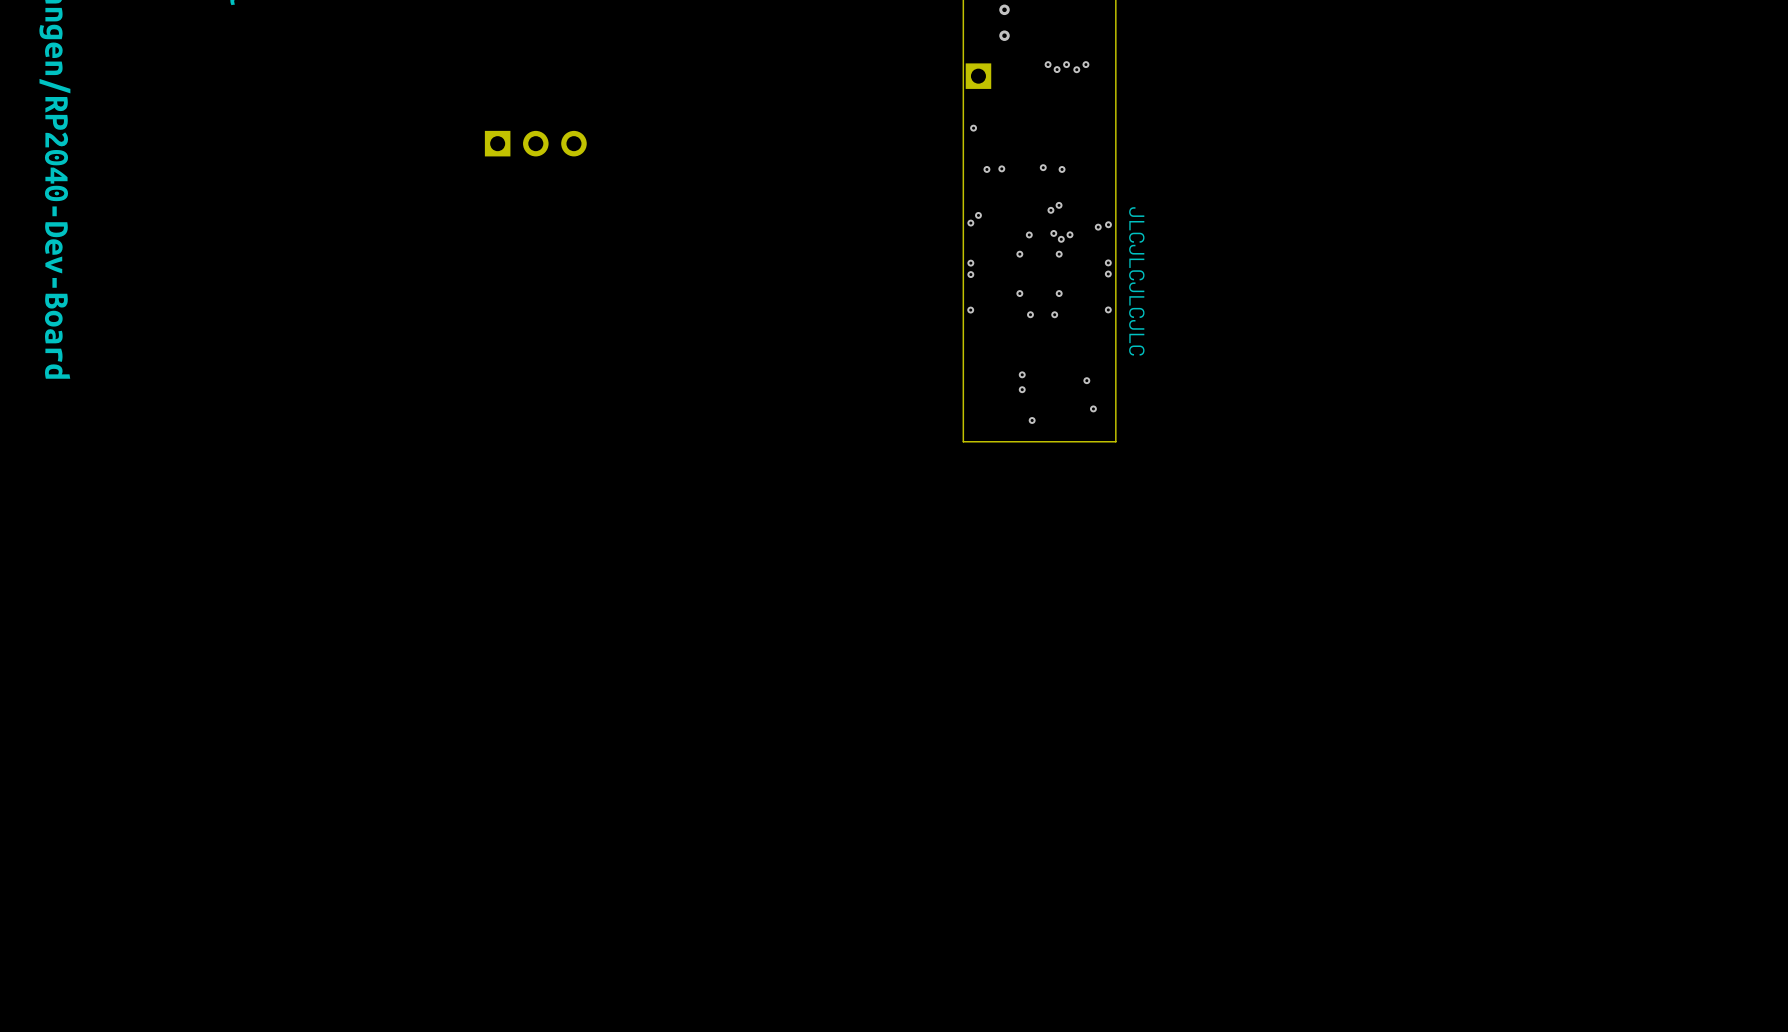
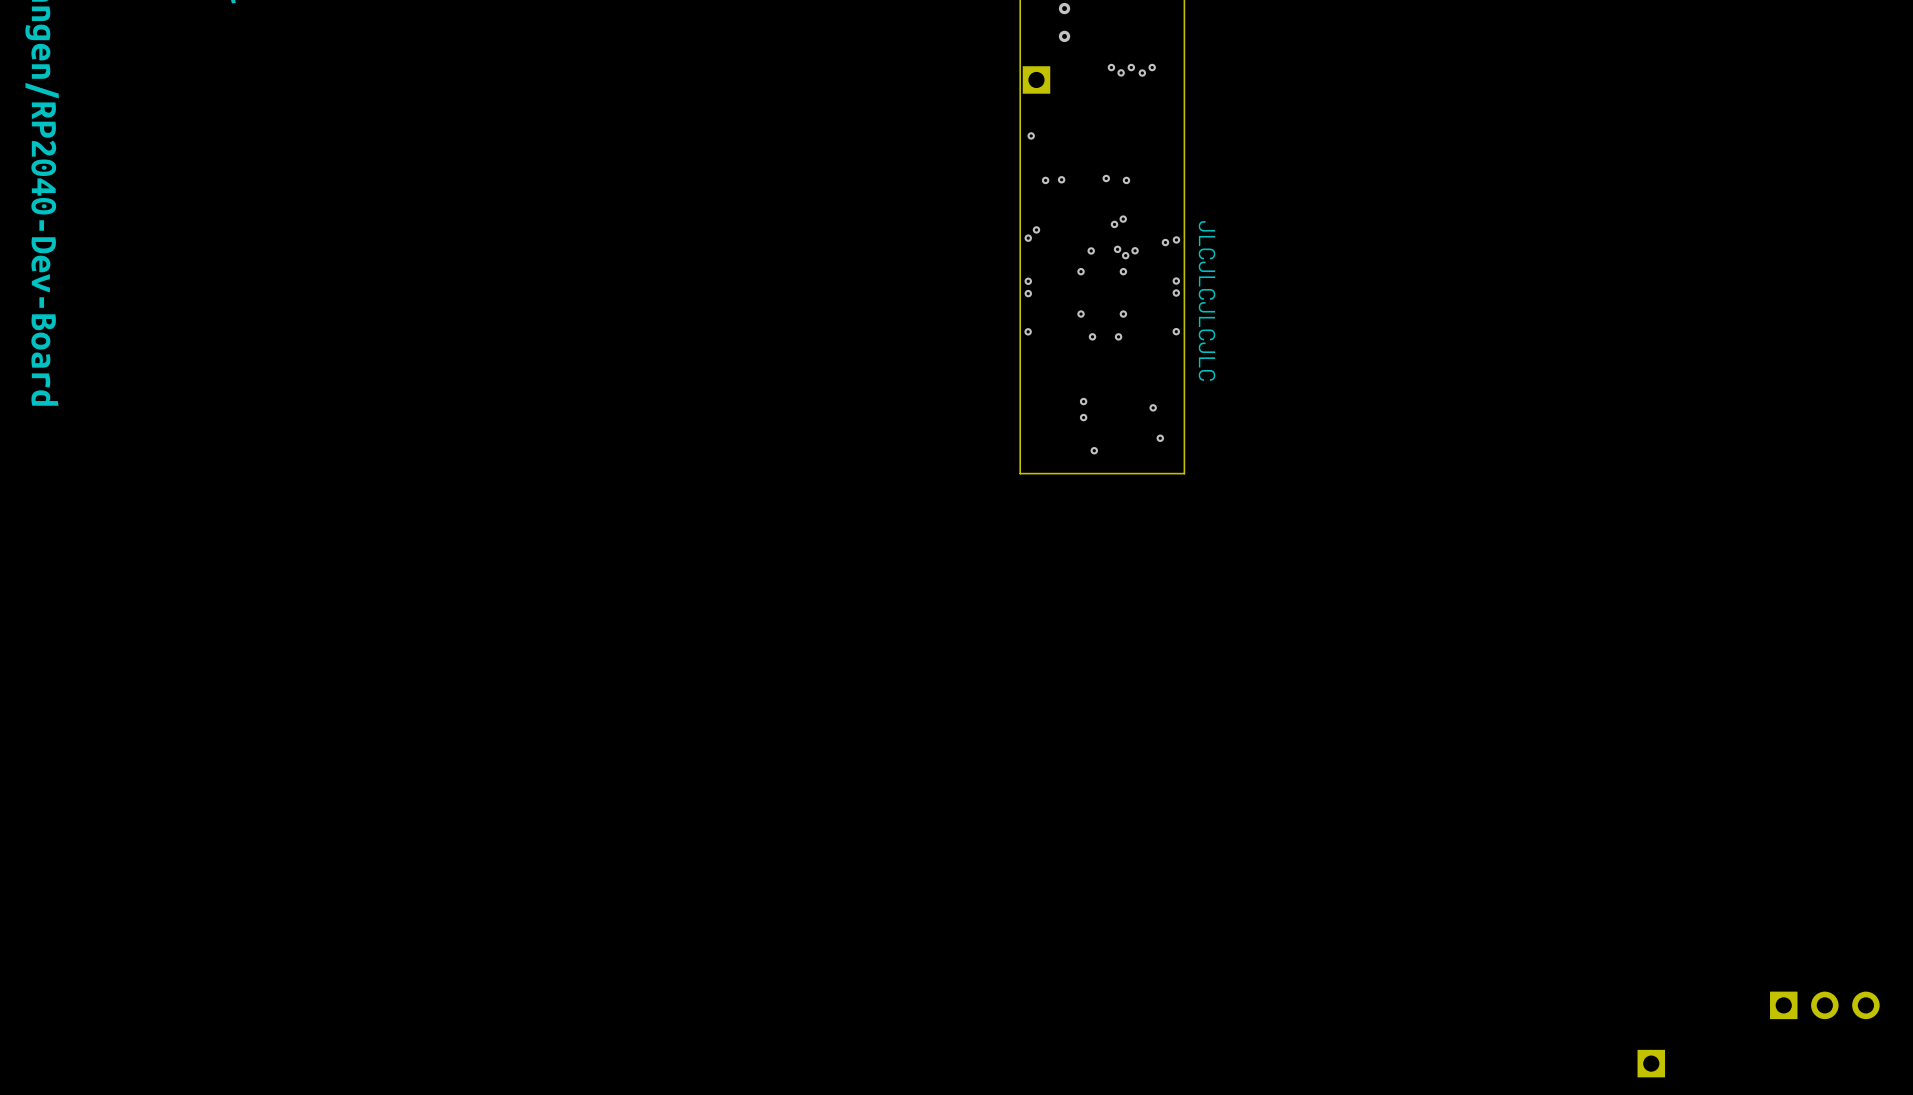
part: (535, 143) -> none
part: none -> (1824, 1005)
part: none -> (1651, 1063)

